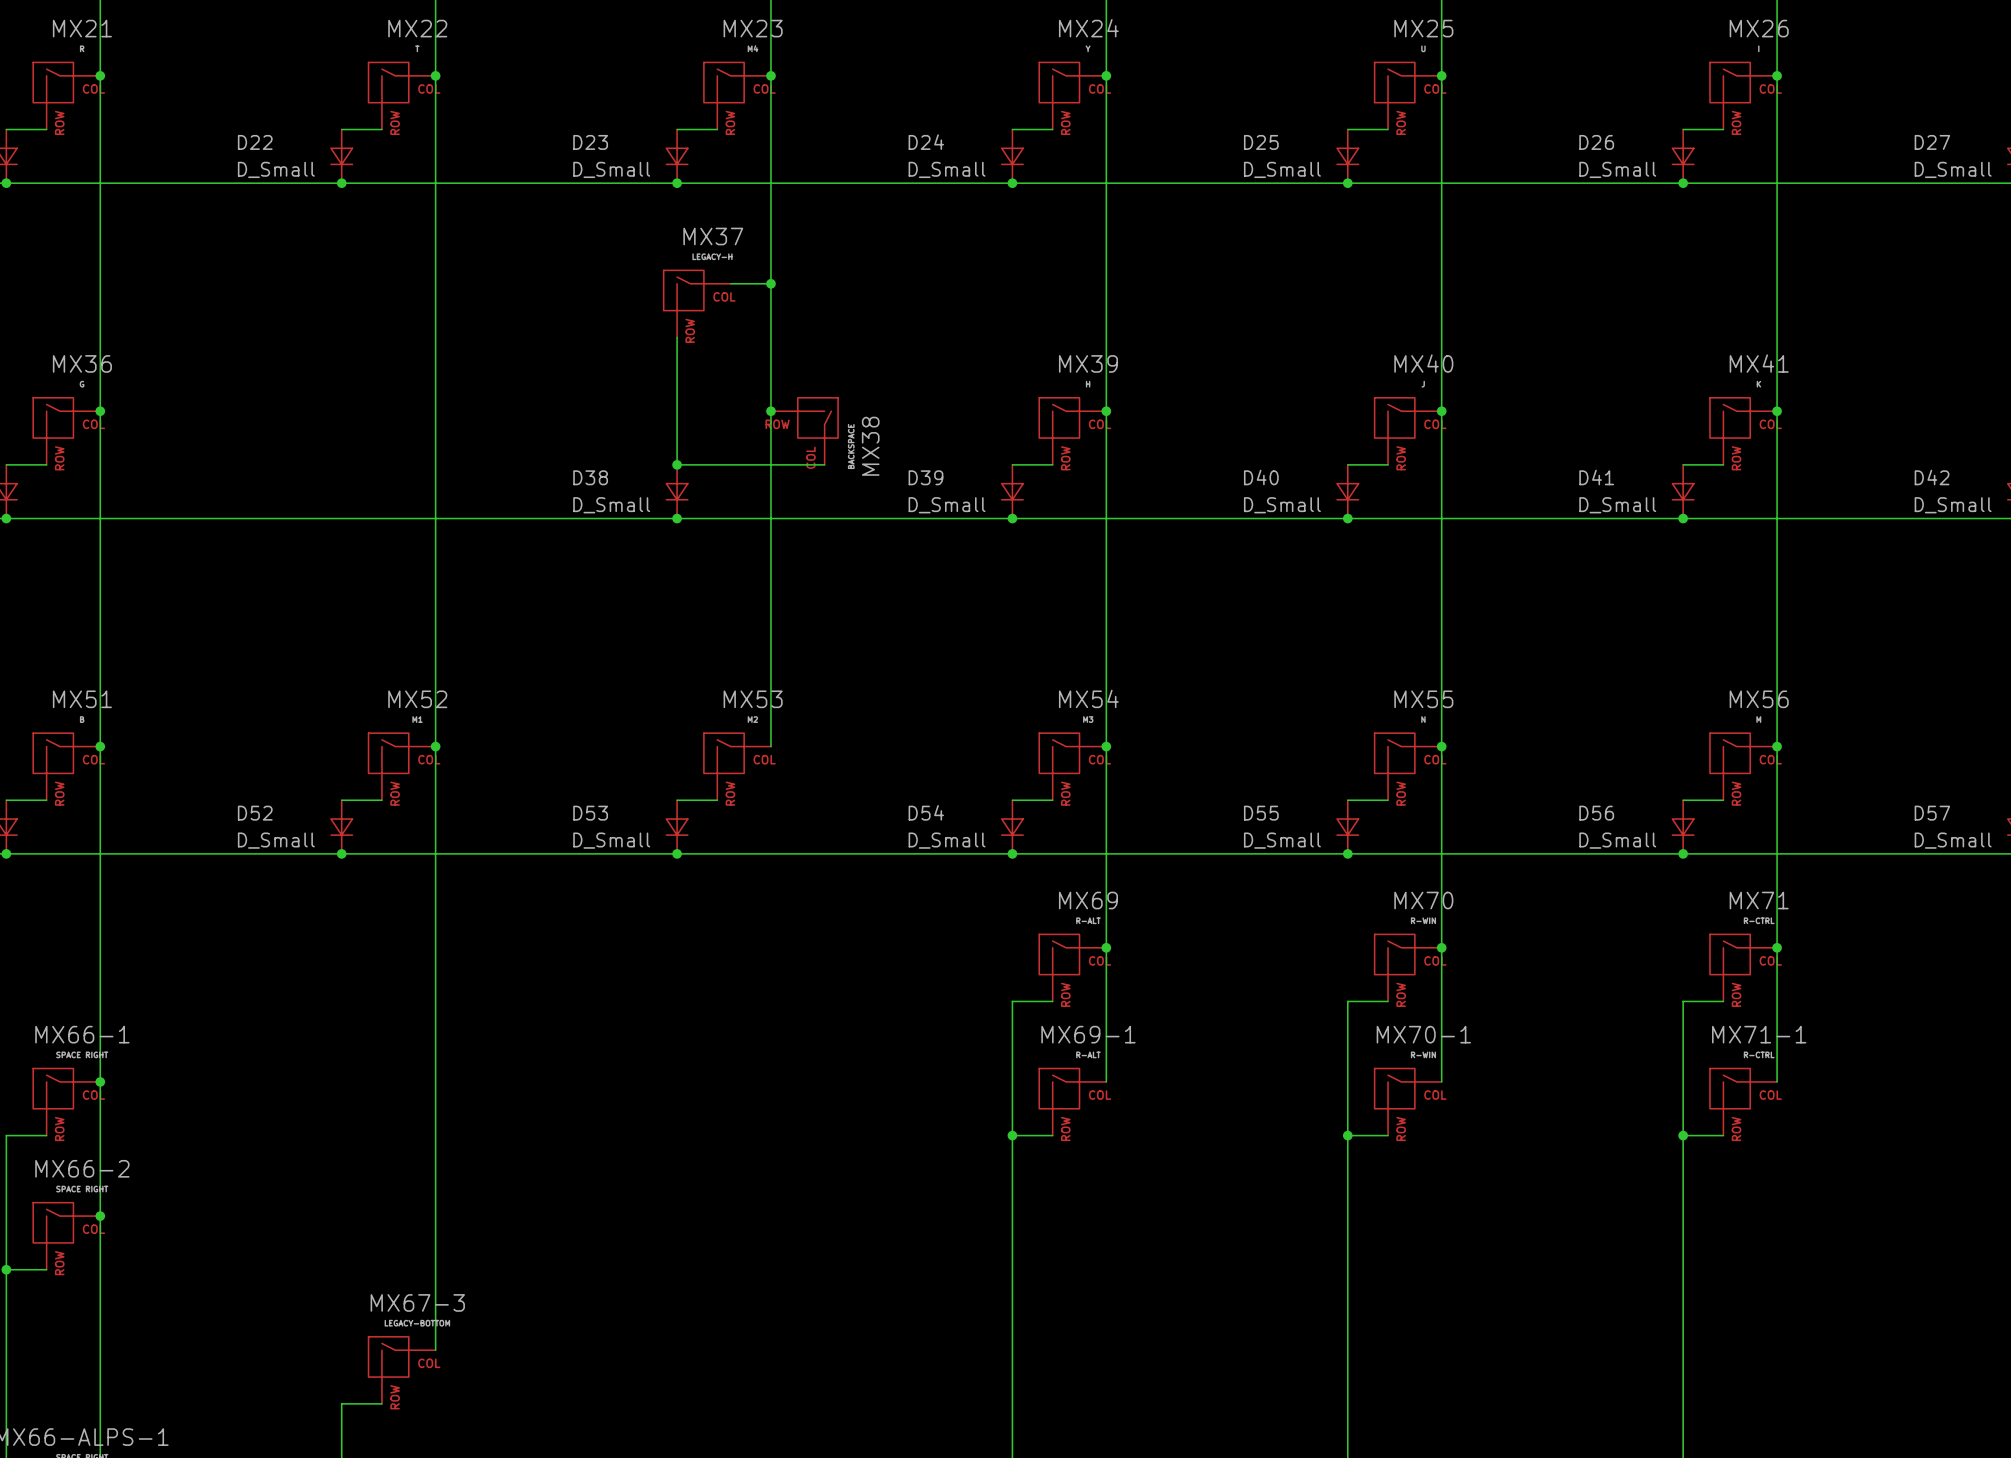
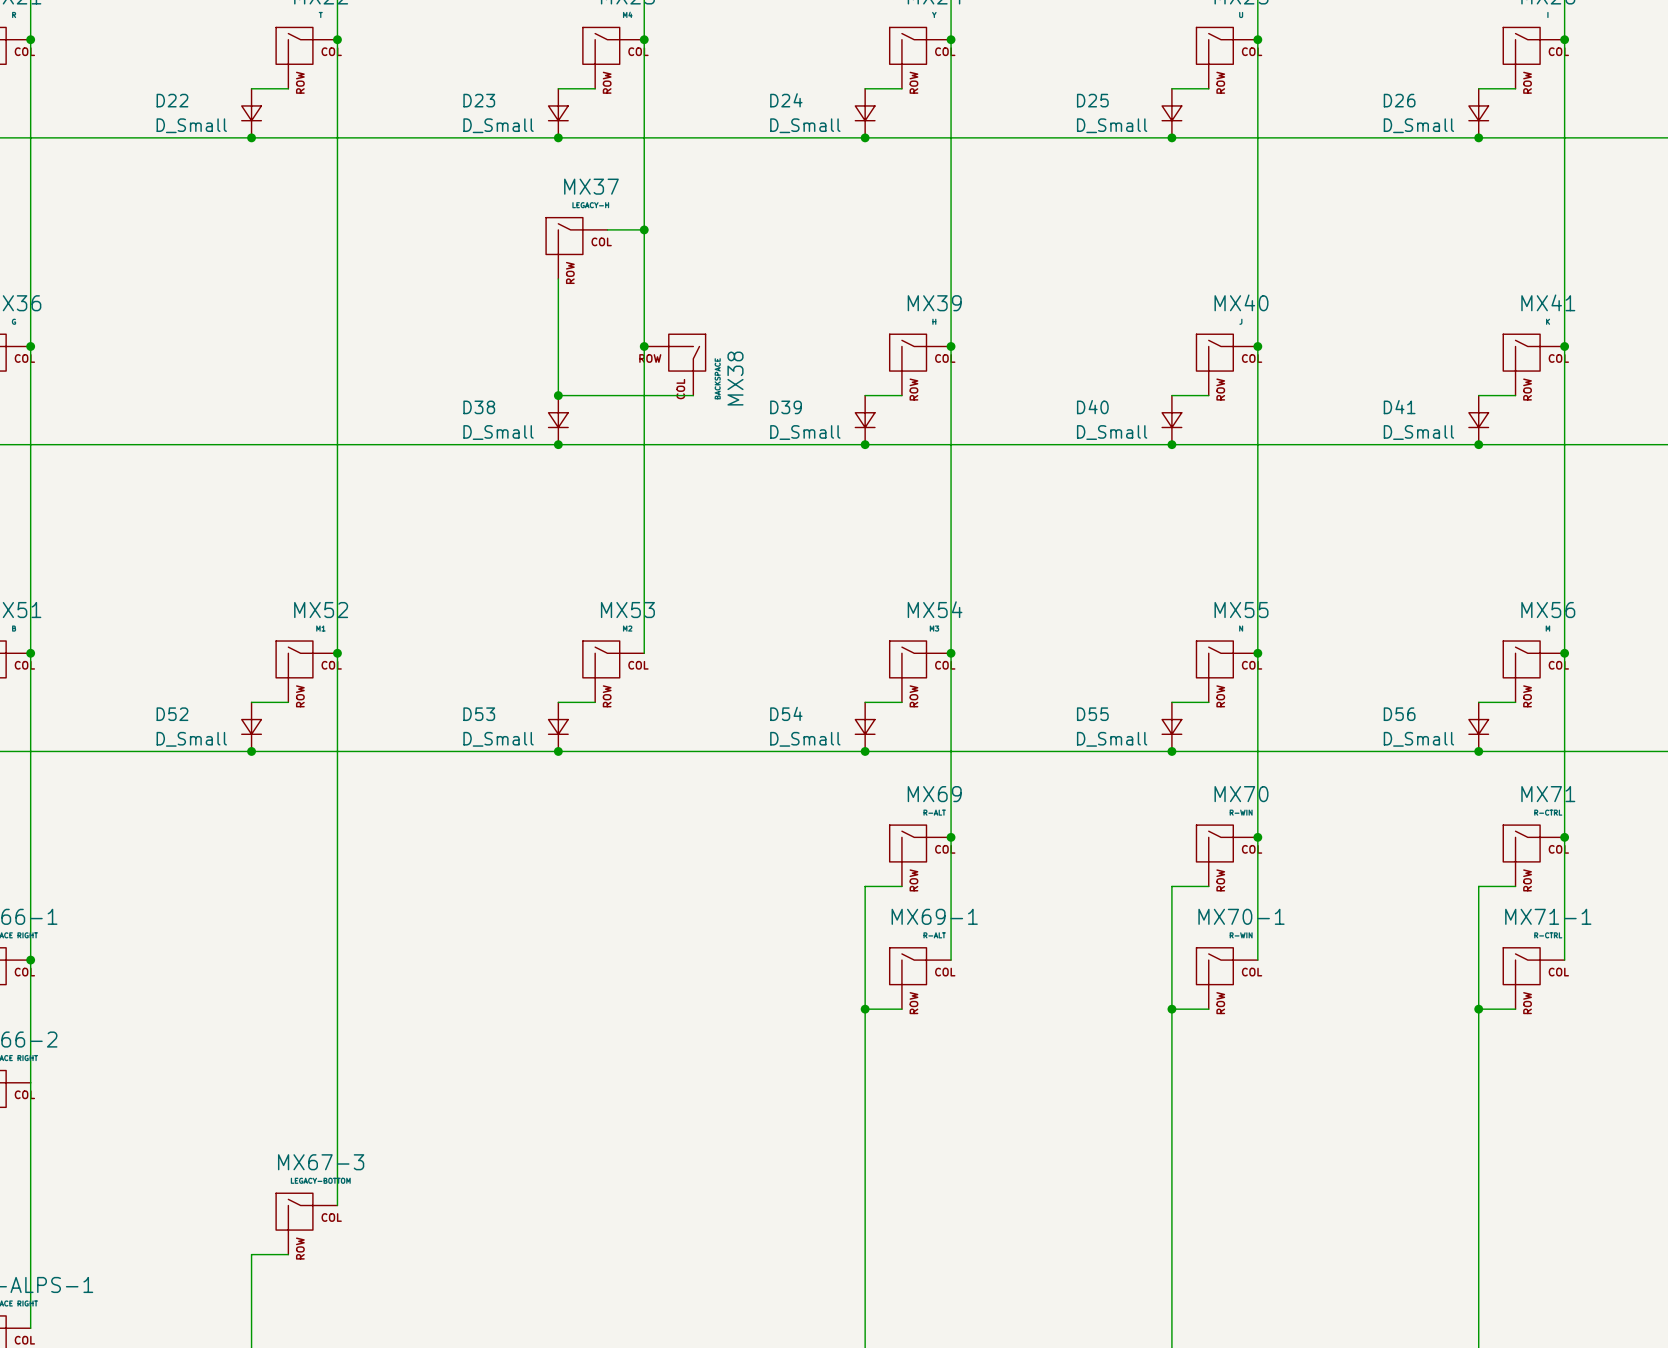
junction: (100, 1216) -> none

